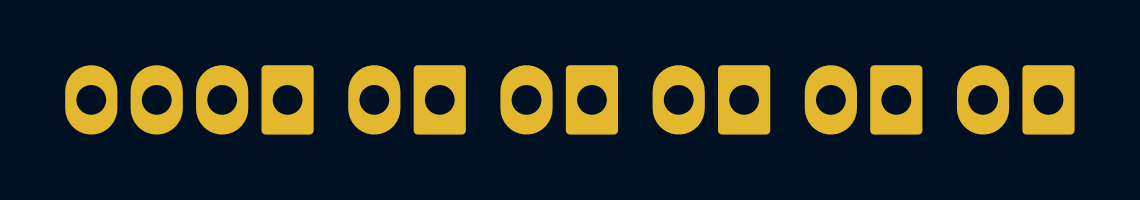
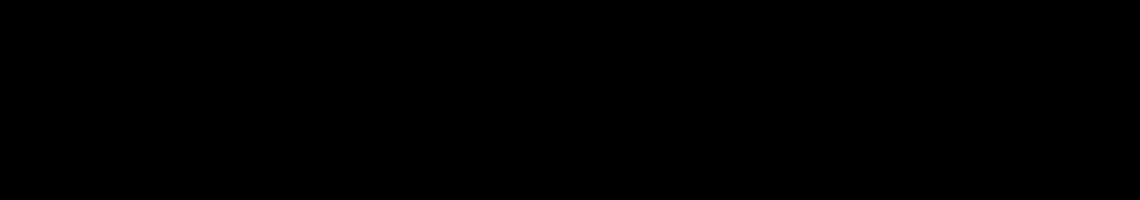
part: (189, 99) -> none
part: (407, 99) -> none
part: (559, 99) -> none
part: (711, 99) -> none
part: (863, 99) -> none
part: (1015, 99) -> none

